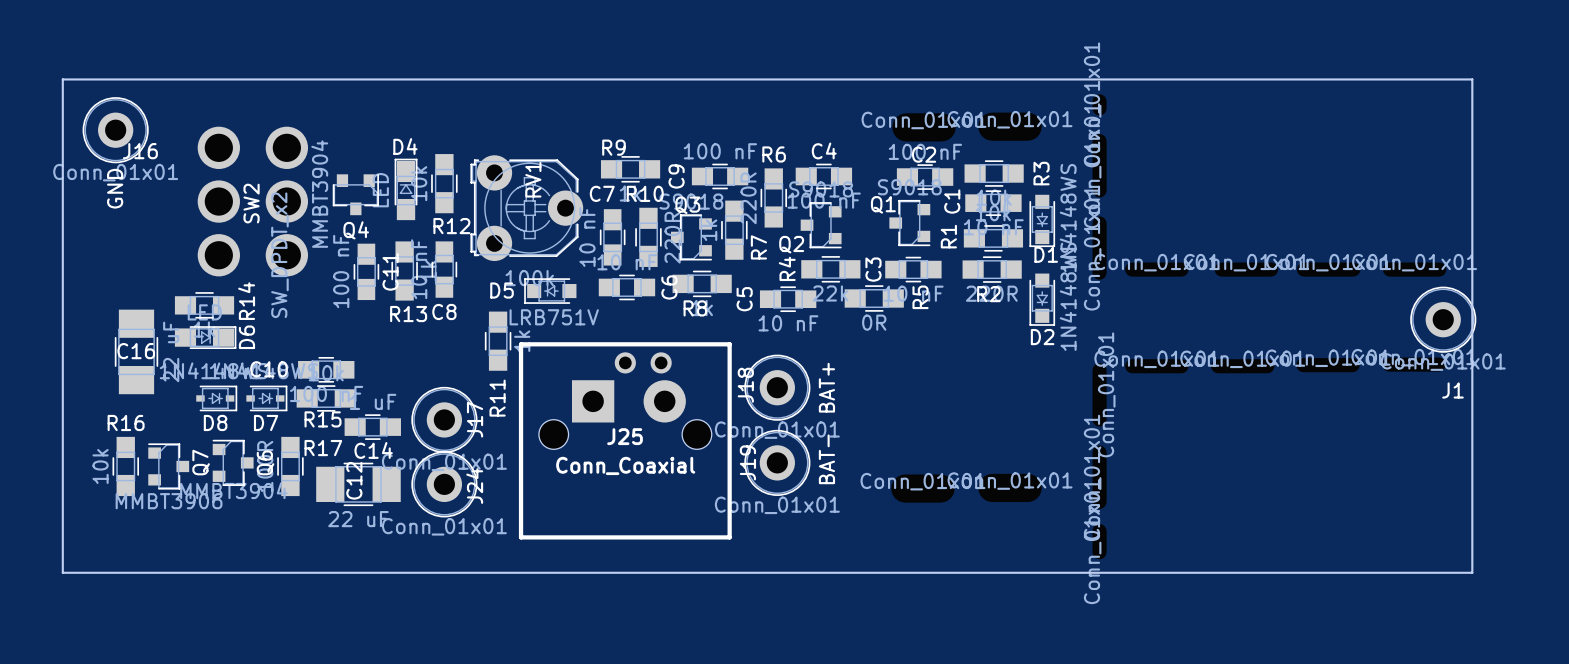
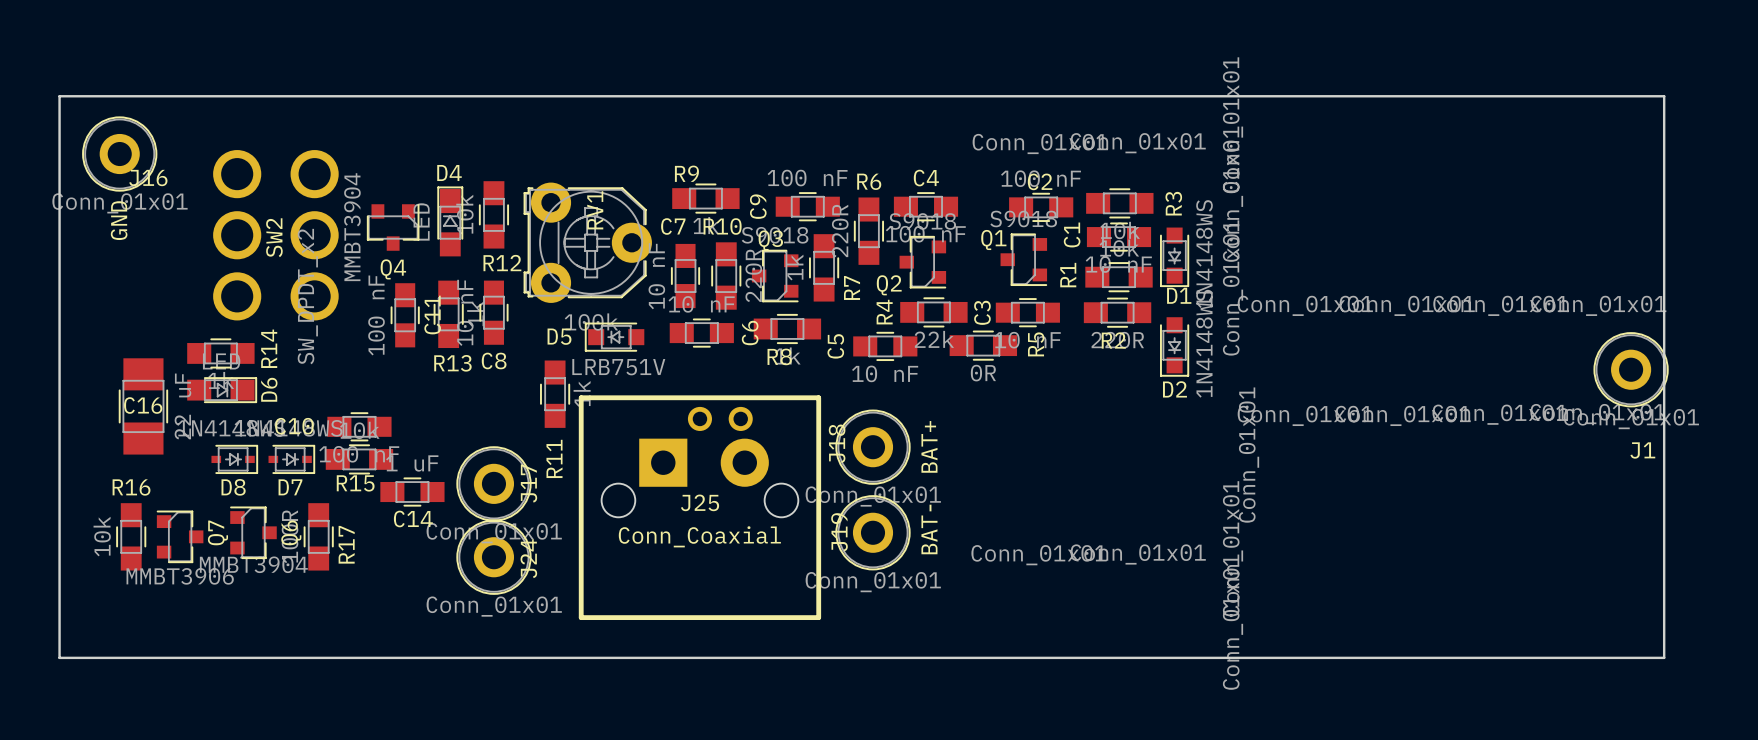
R17 name rotation: 0° (323, 448) -> 90° counterclockwise (346, 544)
C12: 22 uF (358, 484) -> none

